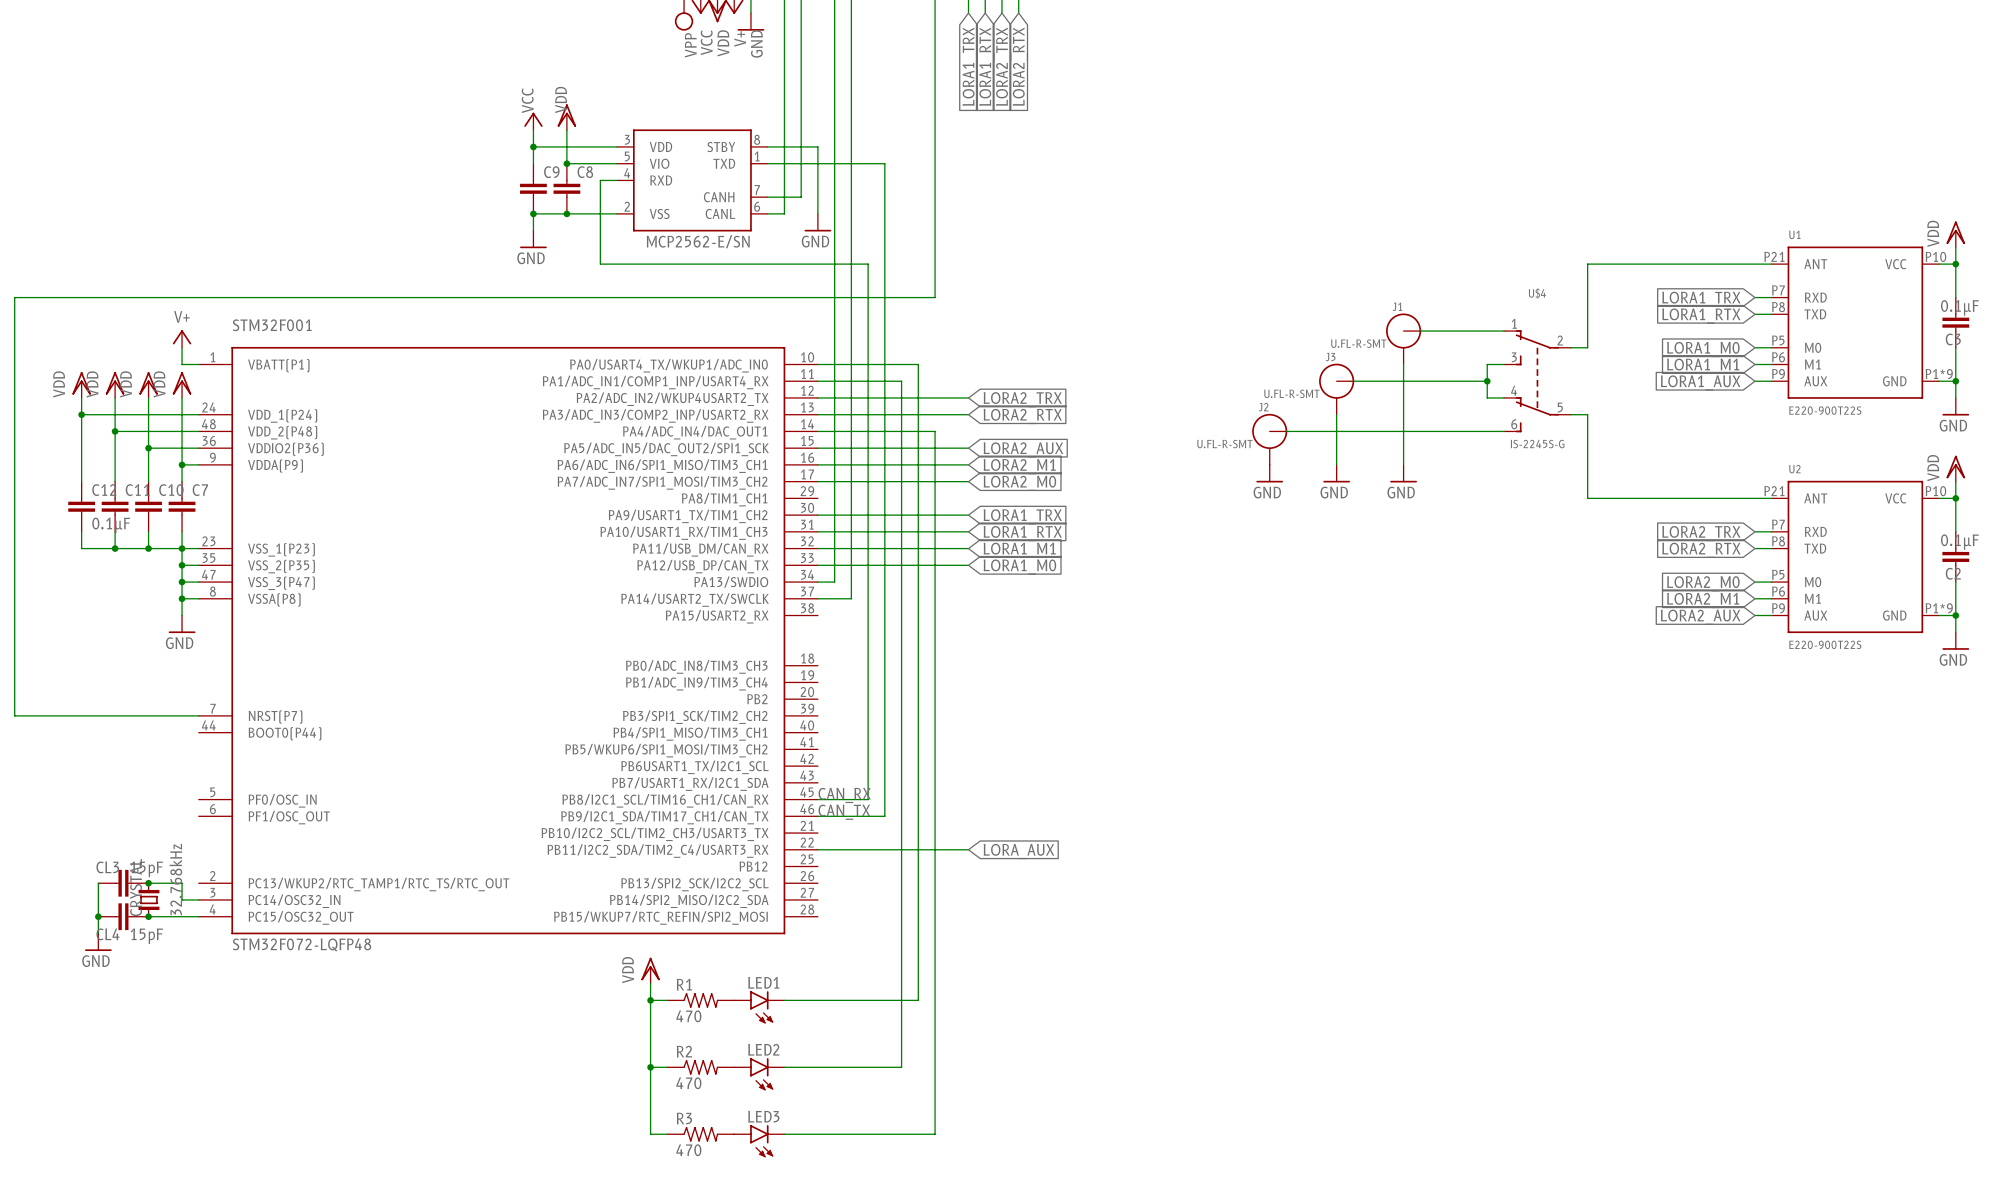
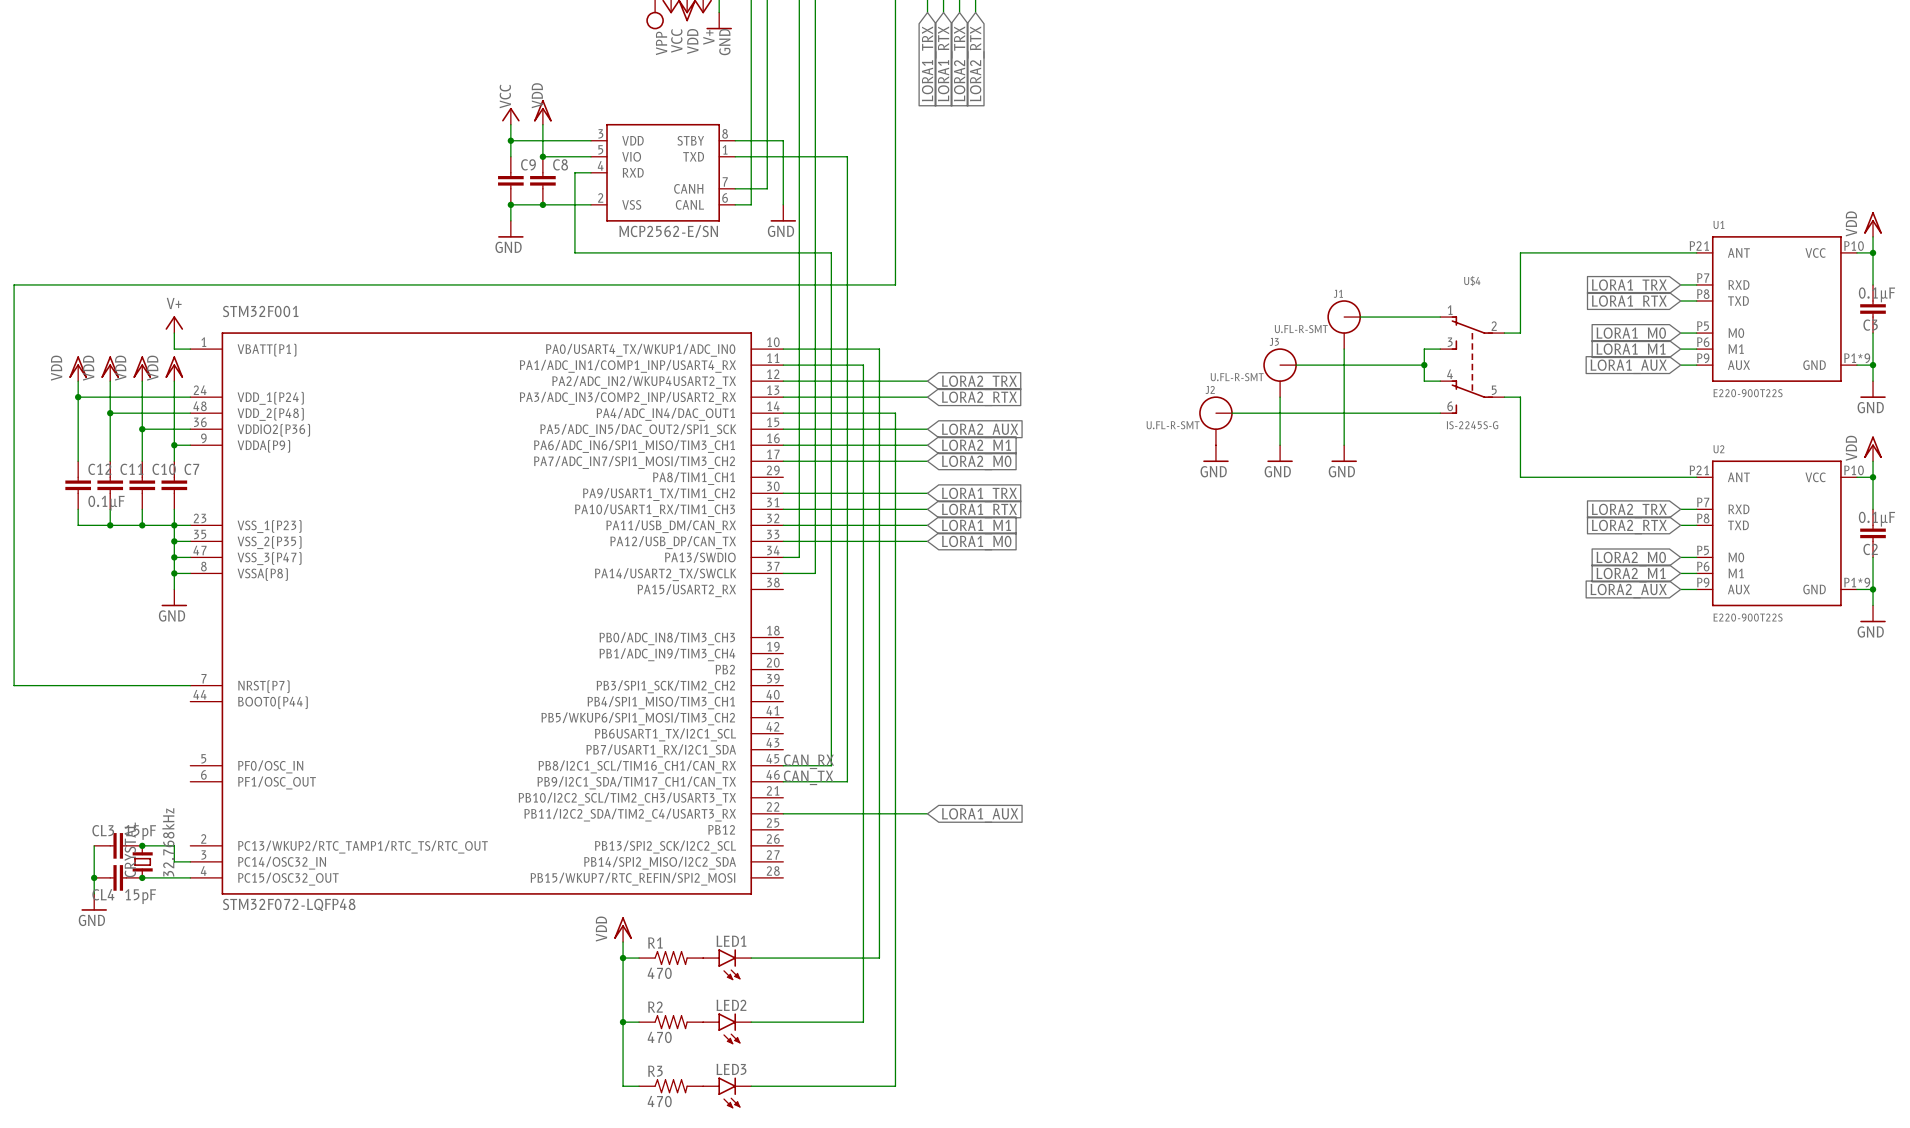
global label: LORA_AUX (1018, 851) -> LORA1_AUX (980, 815)

